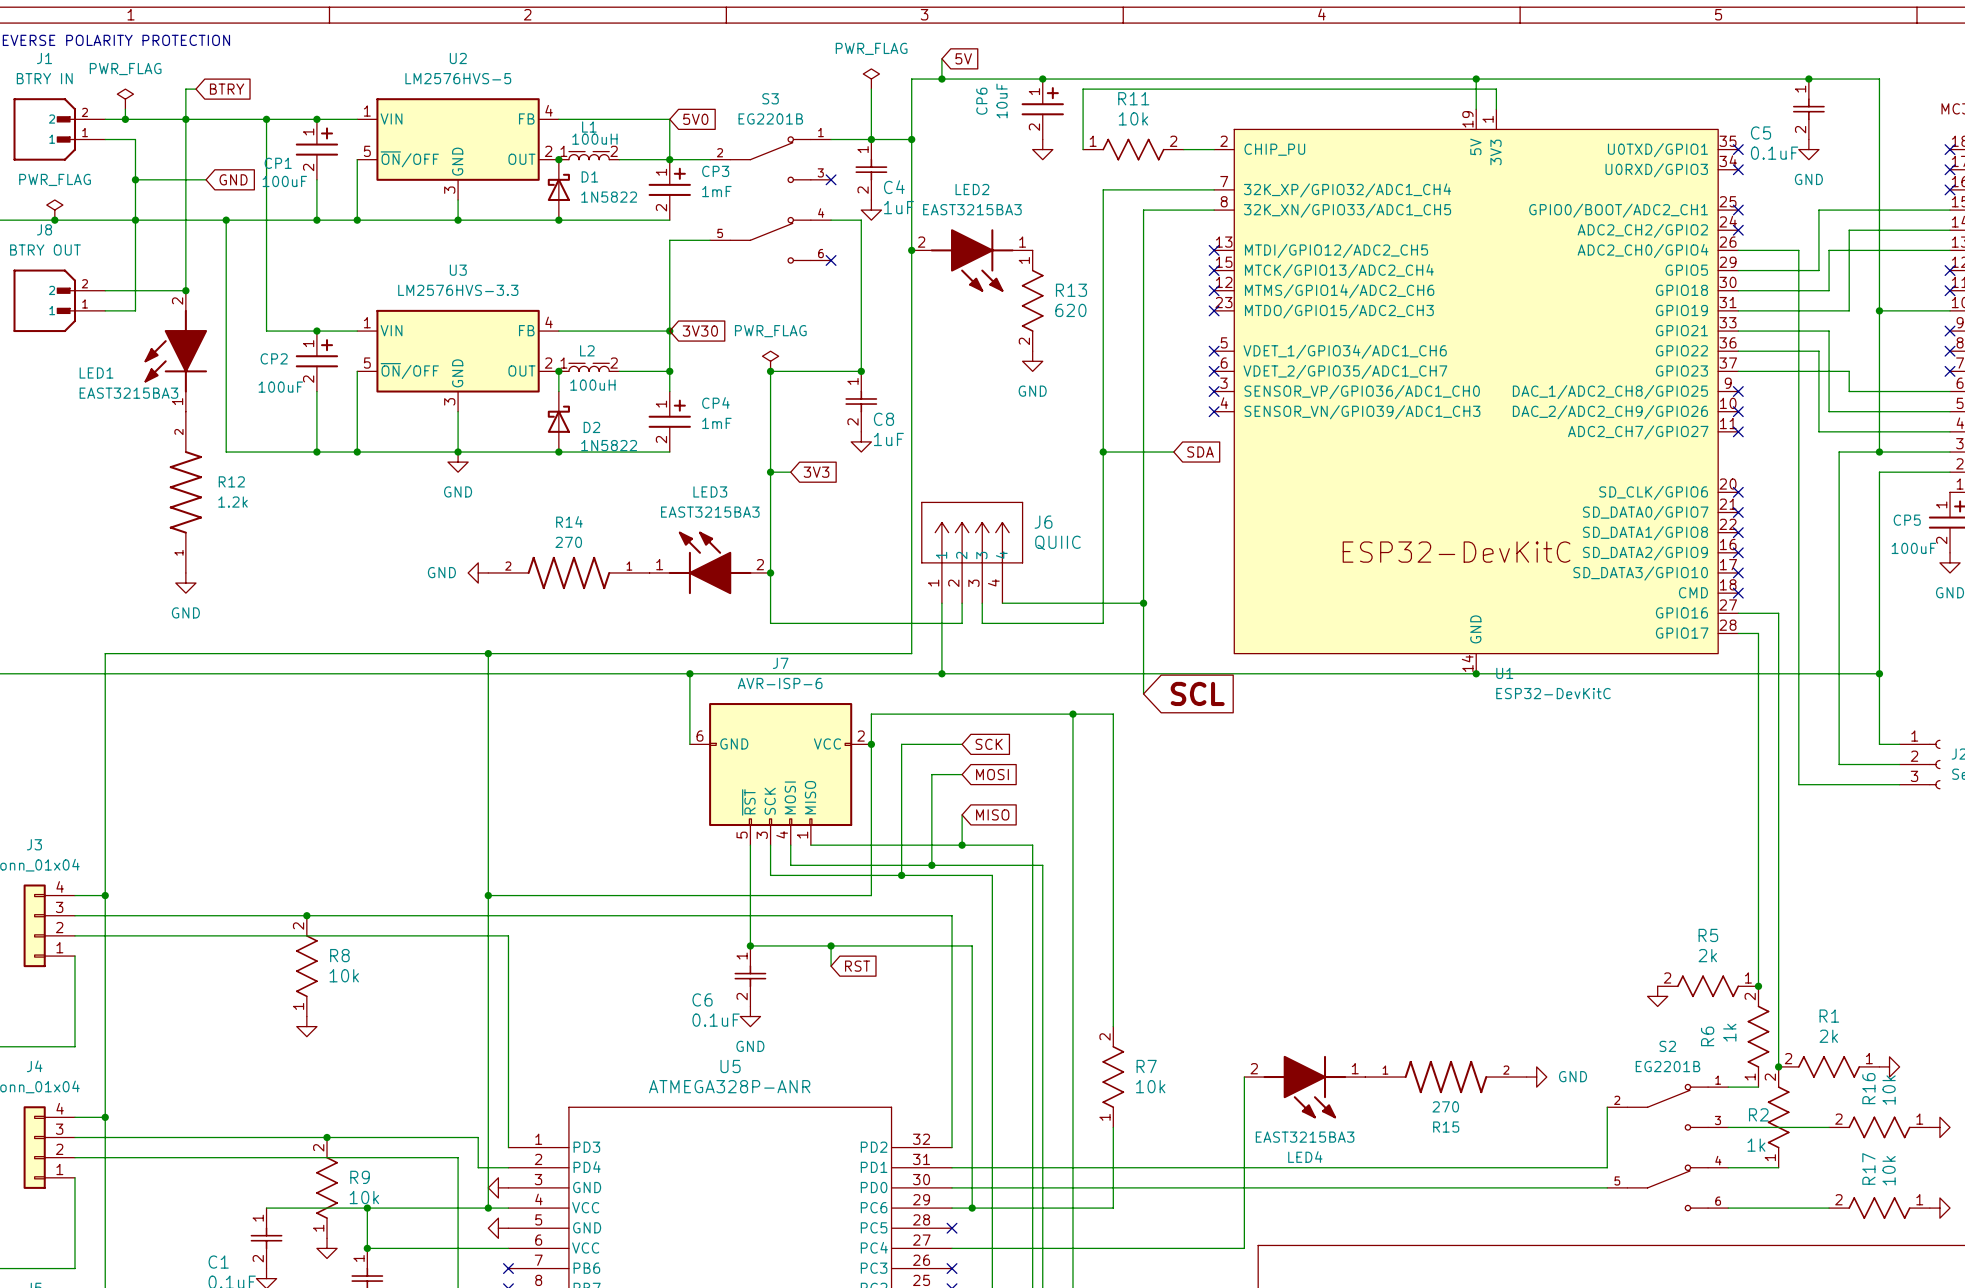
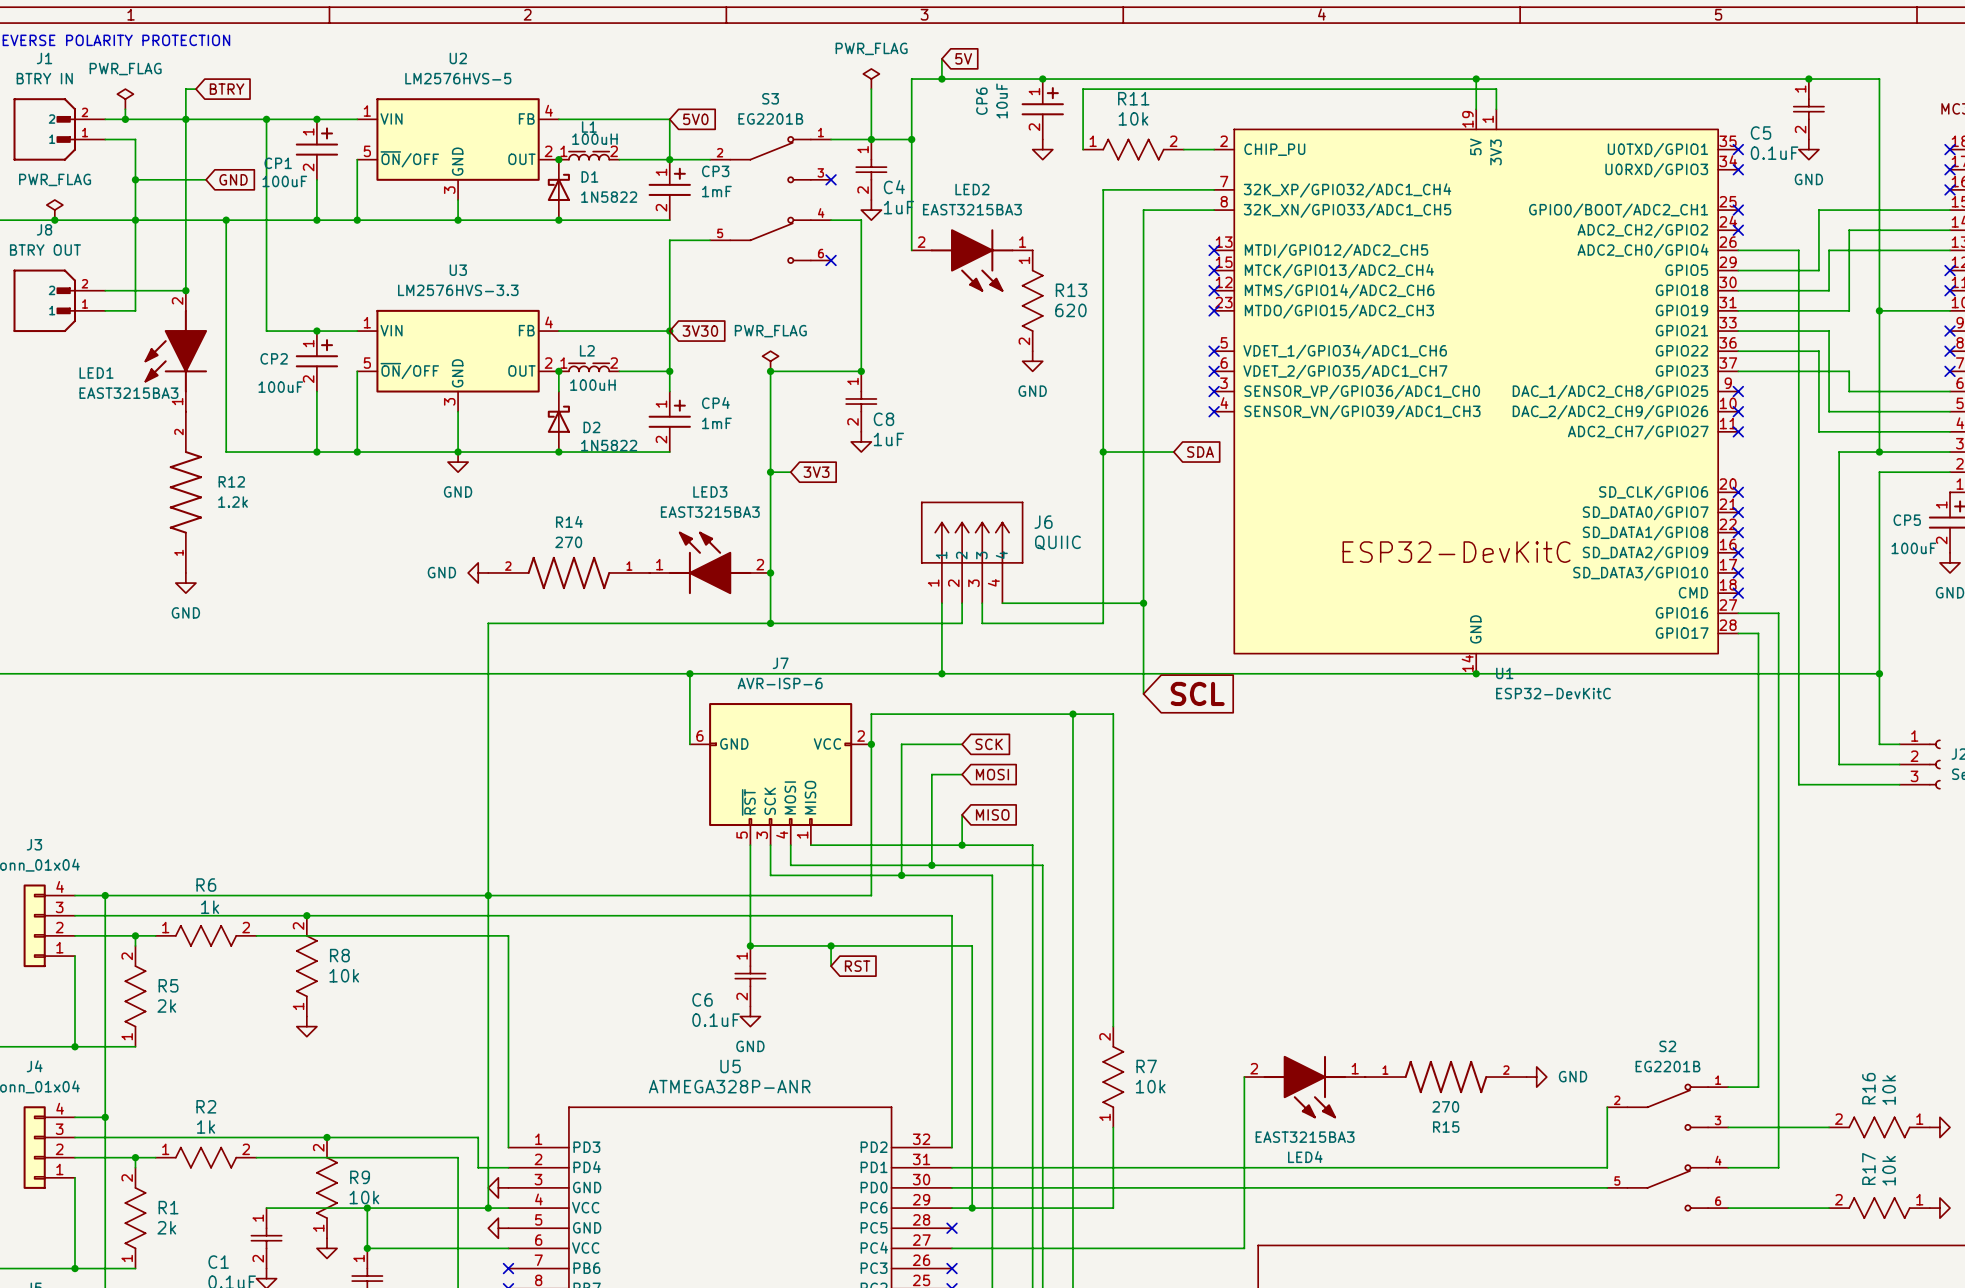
wire: (911, 250) (911, 653) (105, 653) (105, 895) -> (488, 895) (105, 895)
junction: (911, 250) -> none
wire: none -> (770, 623) (488, 623) (488, 653)
junction: none -> (770, 623)
junction: (488, 653) -> none
wire: none -> (135, 935) (135, 945)
junction: none -> (135, 935)
R5 name position: R5 (1708, 935) -> R5 (168, 985)
R5 rotation: 0° (1708, 986) -> 90° clockwise (135, 996)
R5 position: (1708, 986) -> (135, 996)
junction: (1758, 986) -> none
power symbol: (1657, 996) -> none
R1 name position: R1 (1829, 1016) -> R1 (168, 1207)
R6 rotation: 0° (1758, 1036) -> 90° clockwise (206, 935)
R6 position: (1758, 1036) -> (206, 935)
wire: none -> (74, 1046) (135, 1046)
junction: none -> (74, 1046)
junction: (1778, 1066) -> none
R1 rotation: 0° (1829, 1066) -> 90° clockwise (135, 1218)
R1 position: (1829, 1066) -> (135, 1218)
power symbol: (1889, 1066) -> none
R2 name position: R2 (1758, 1114) -> R2 (206, 1106)
R2 rotation: 0° (1778, 1117) -> 90° clockwise (206, 1157)
R2 position: (1778, 1117) -> (206, 1157)
R2 value position: 1k (1756, 1145) -> 1k (206, 1126)
wire: none -> (135, 1157) (135, 1167)
junction: none -> (135, 1157)
wire: none -> (74, 1268) (135, 1268)
junction: none -> (74, 1268)

